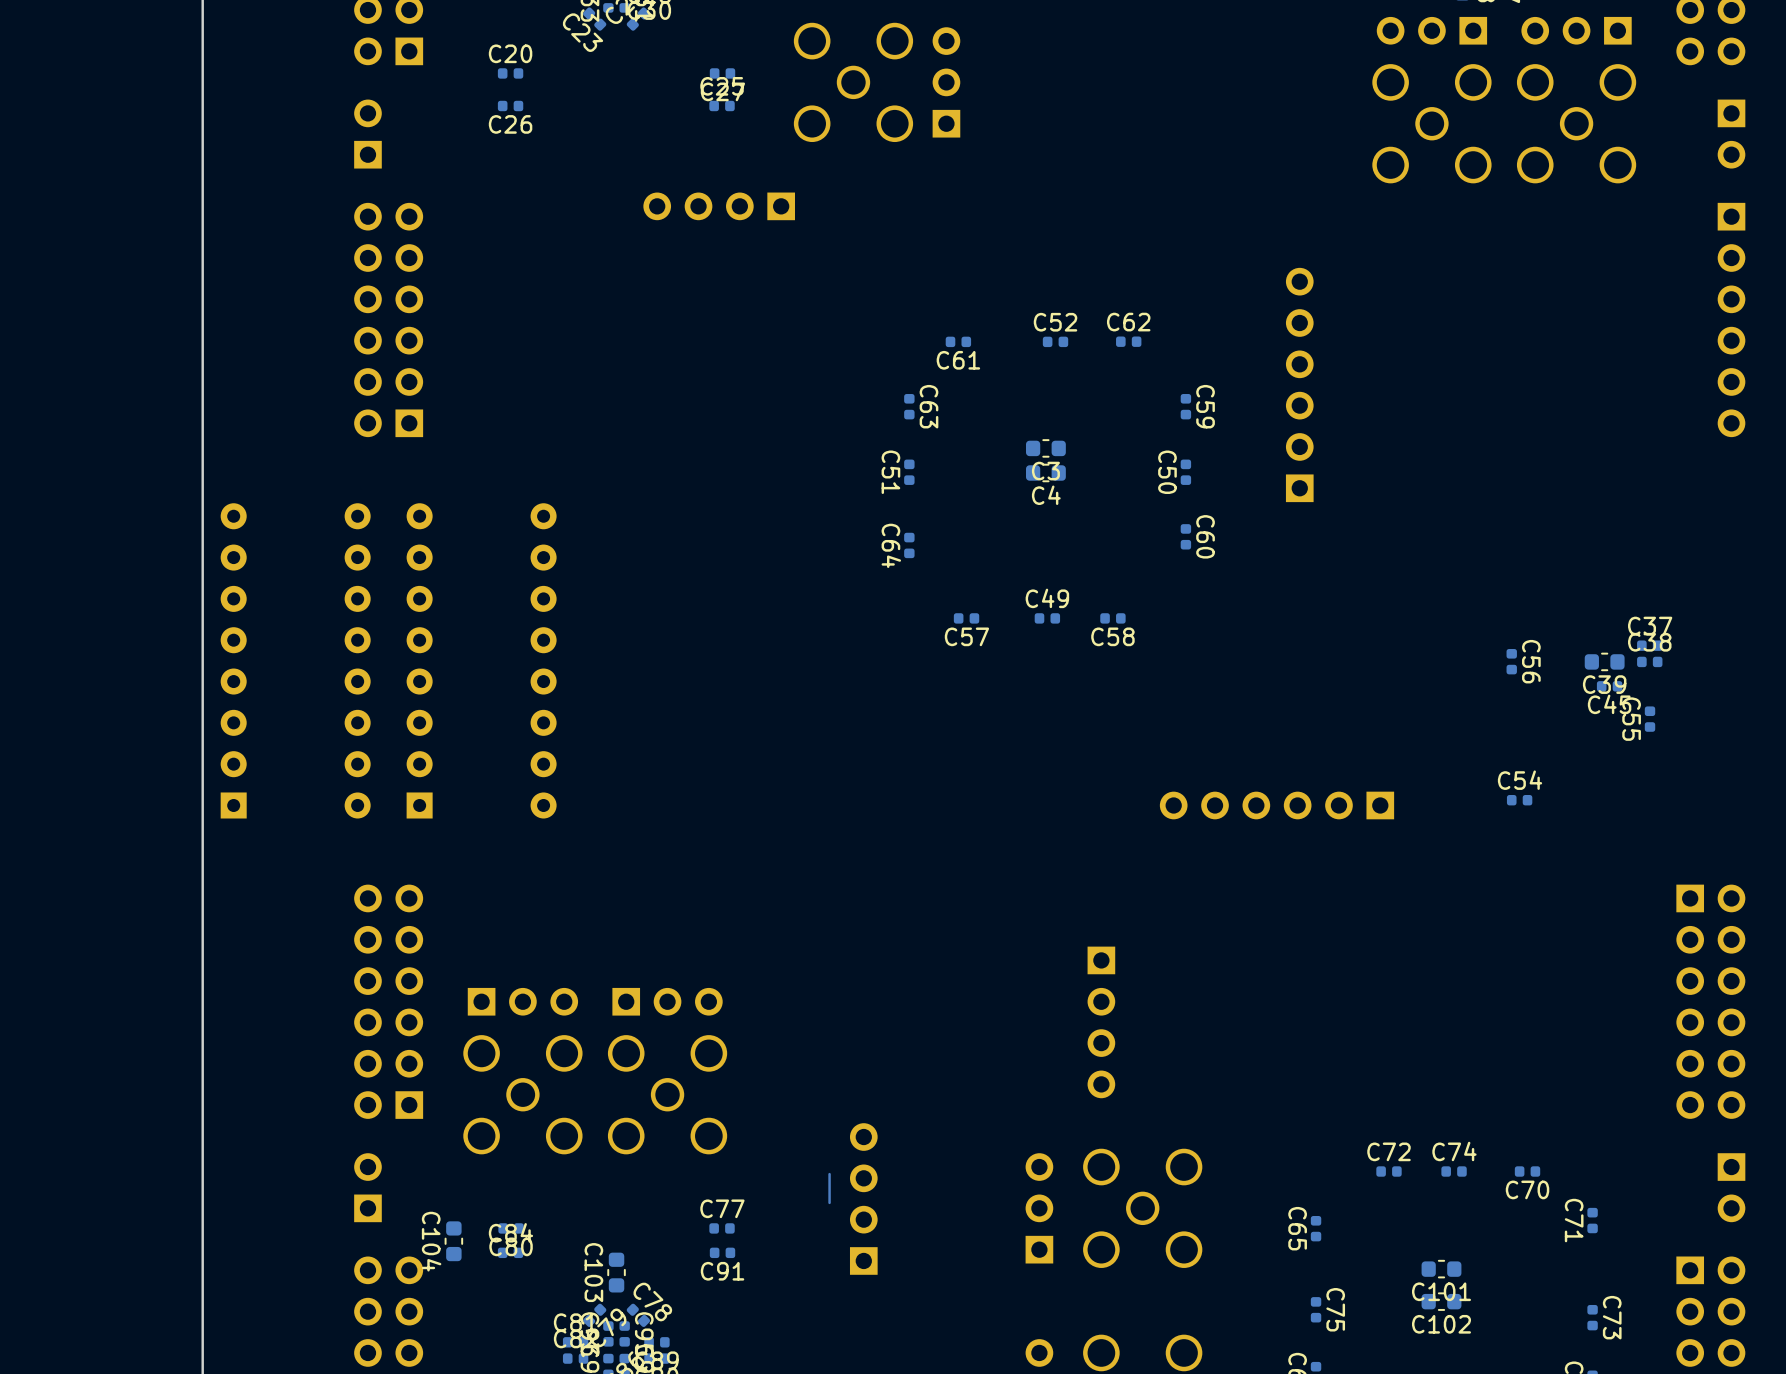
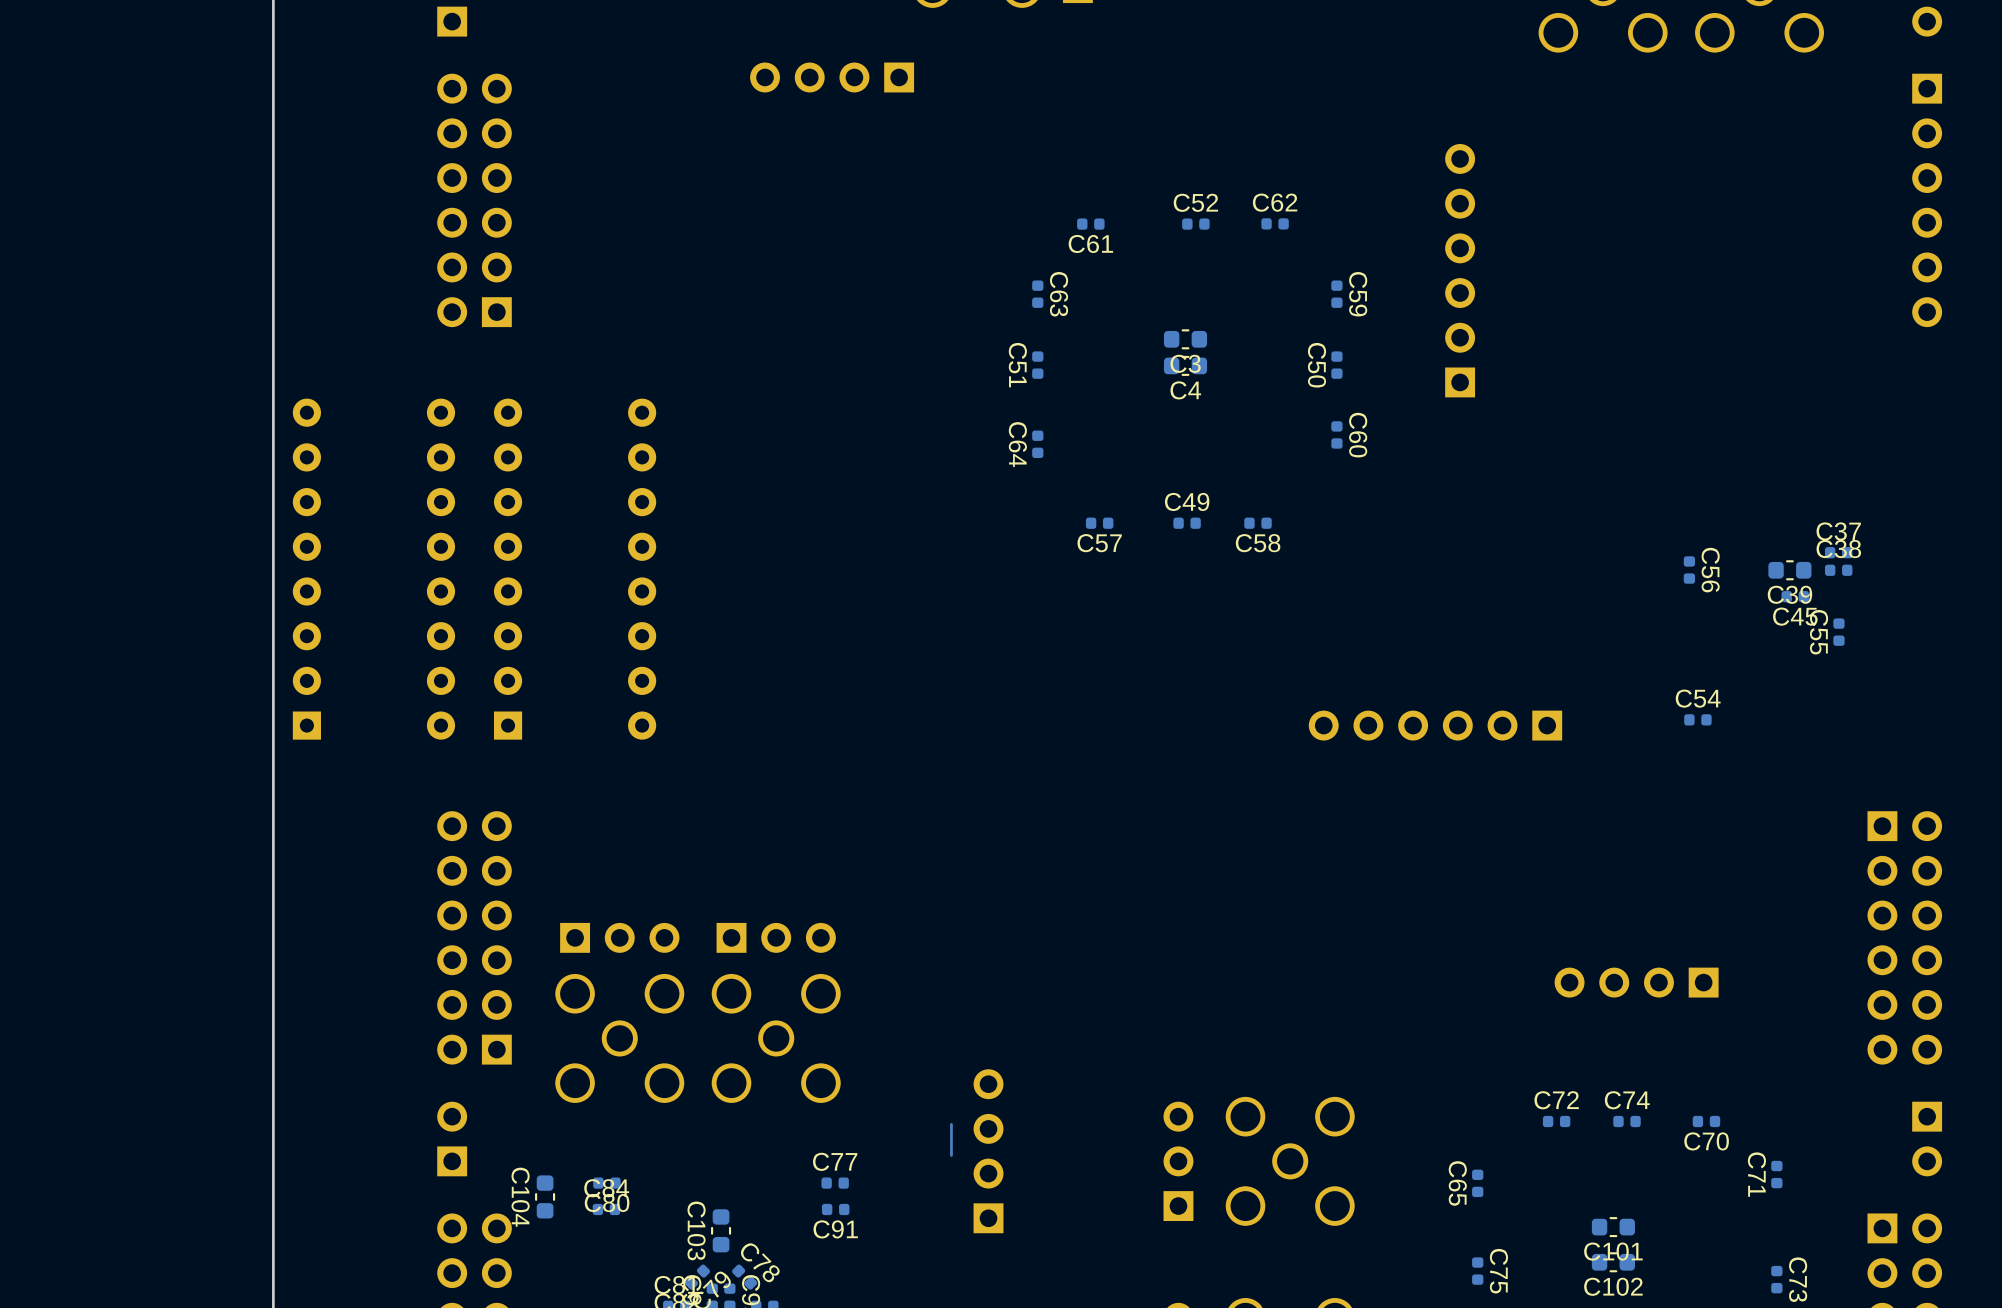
part rotation: 0° (1101, 1022) -> 90° clockwise (1636, 982)
part position: (1101, 1022) -> (1636, 982)

